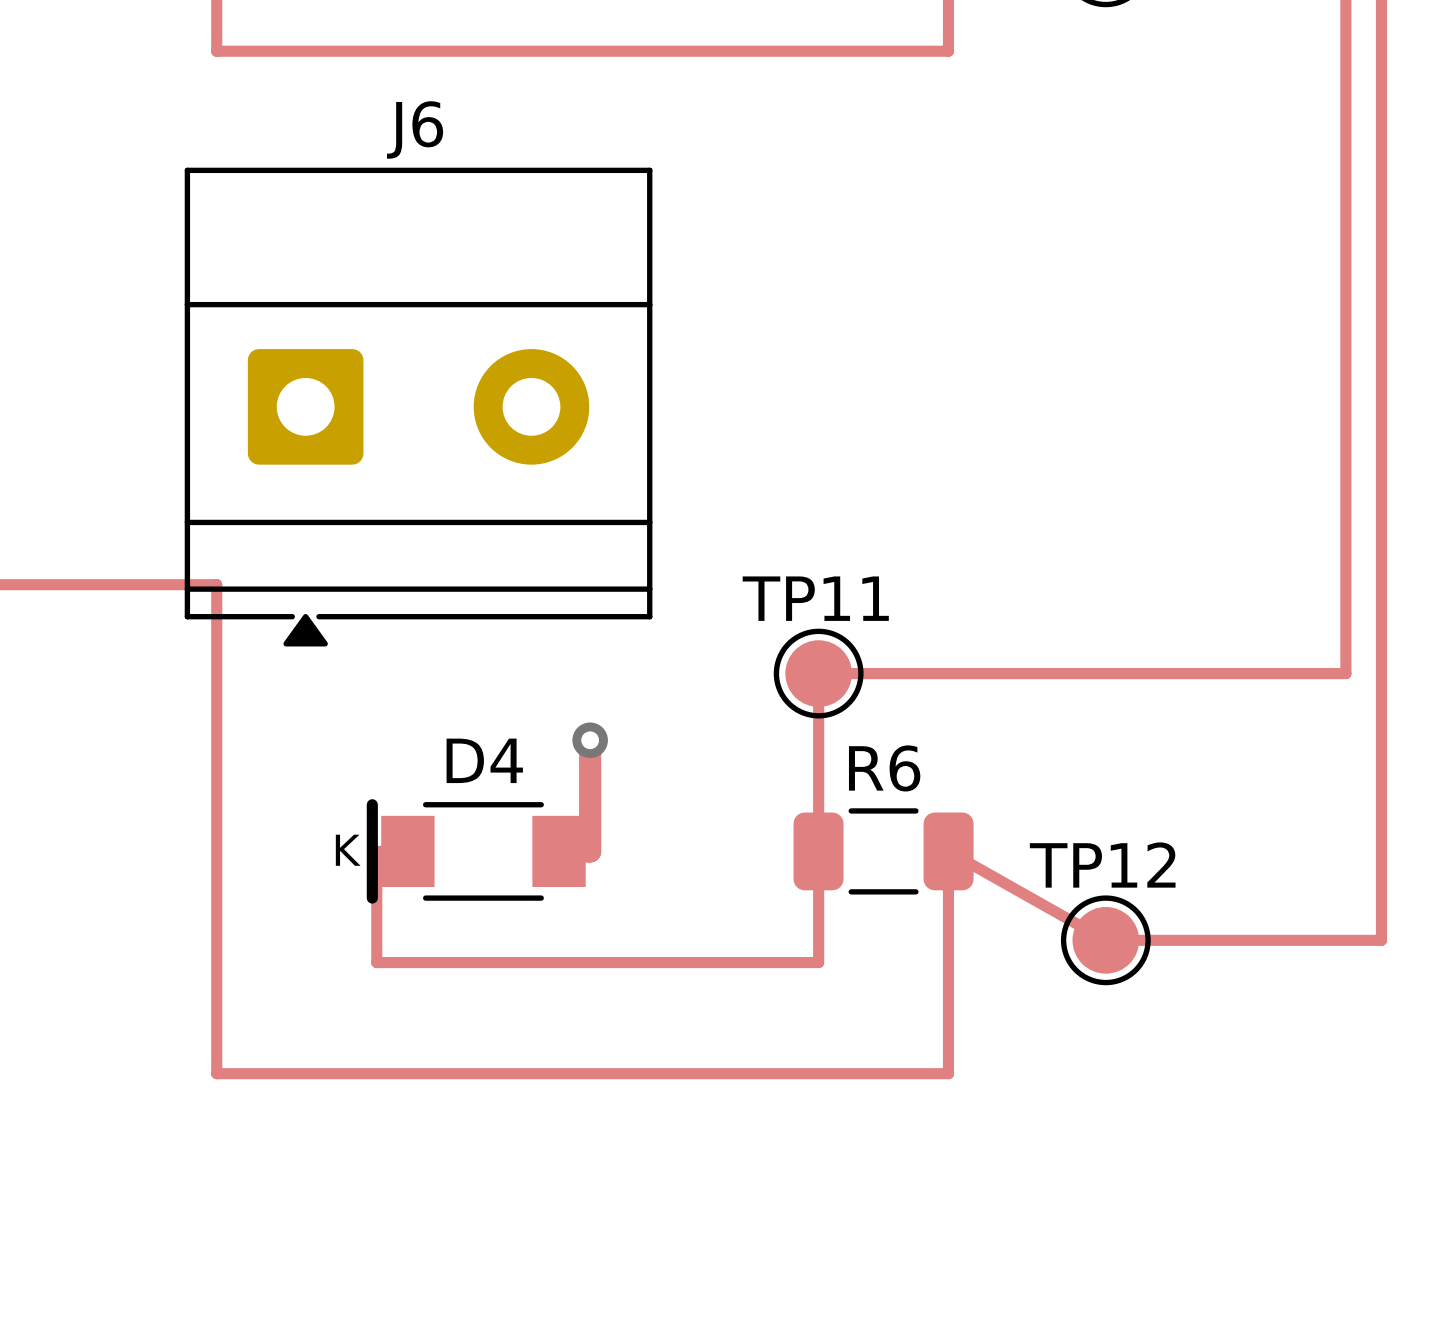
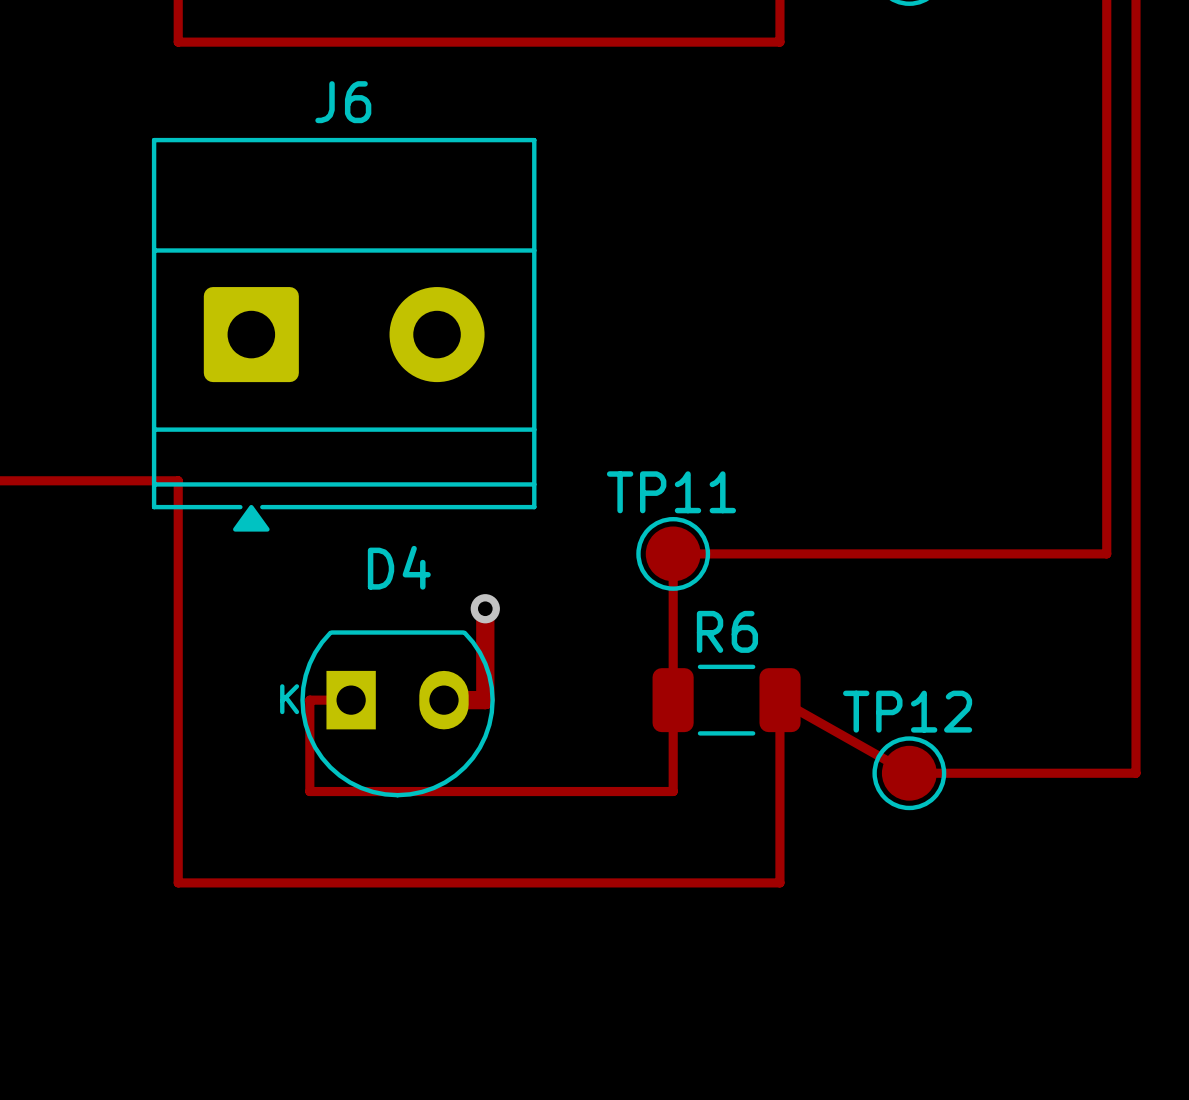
D4 footprint: [366, 799, 586, 904] -> [300, 630, 495, 798]

